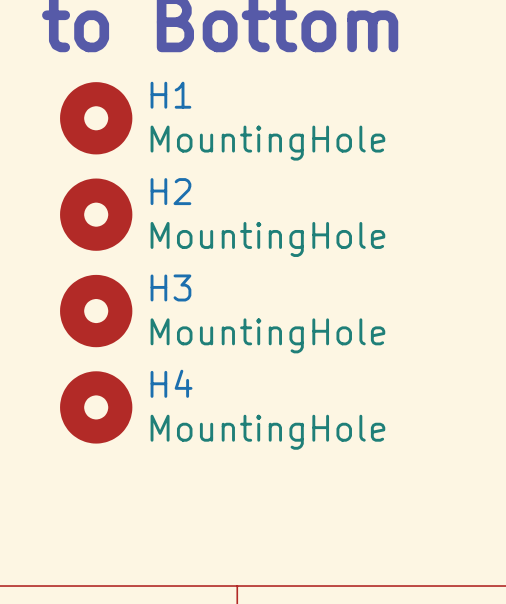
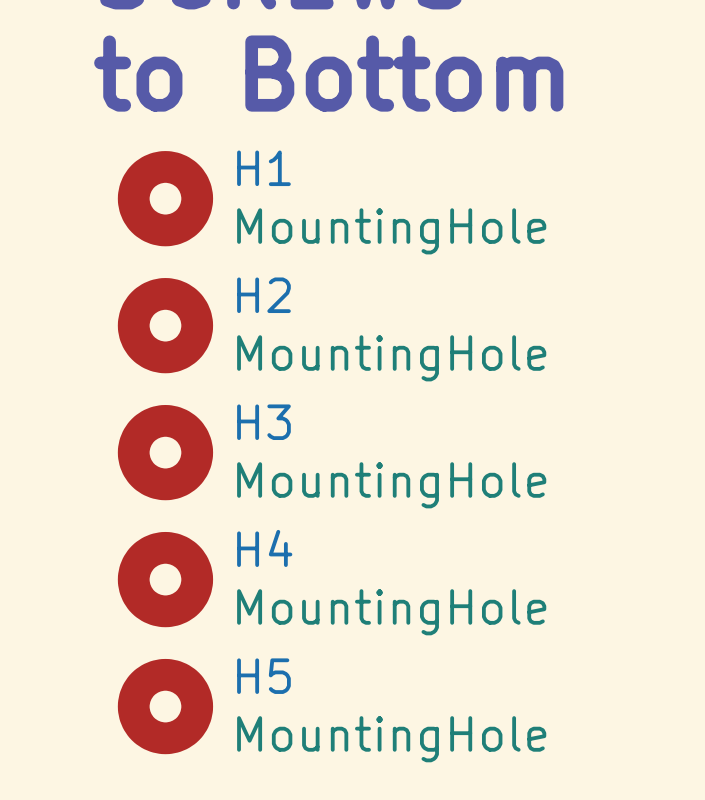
H5: none -> MountingHole (165, 706)

